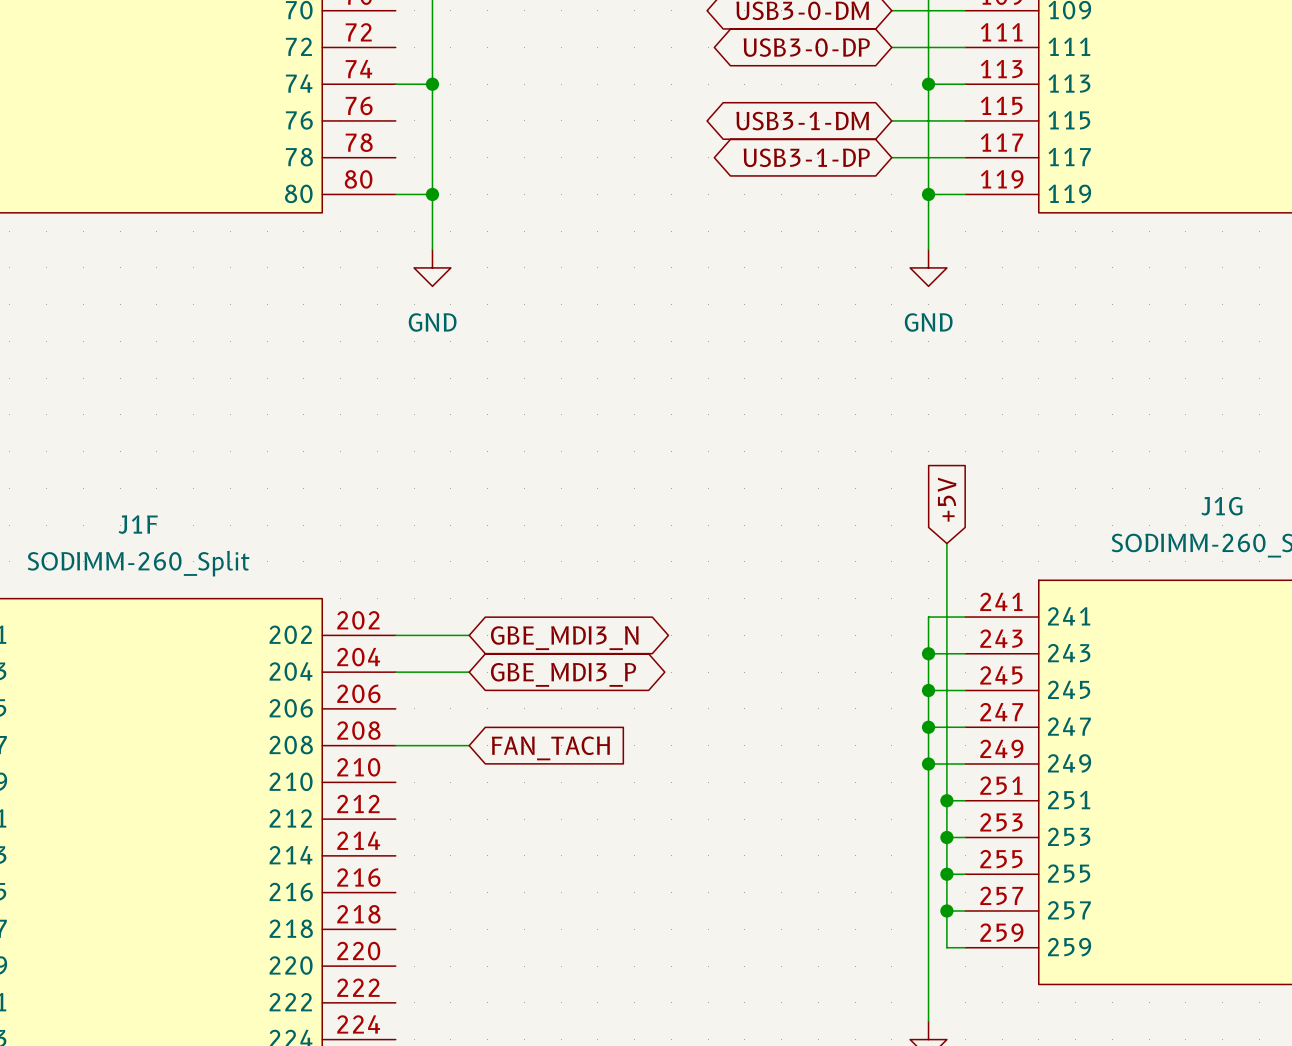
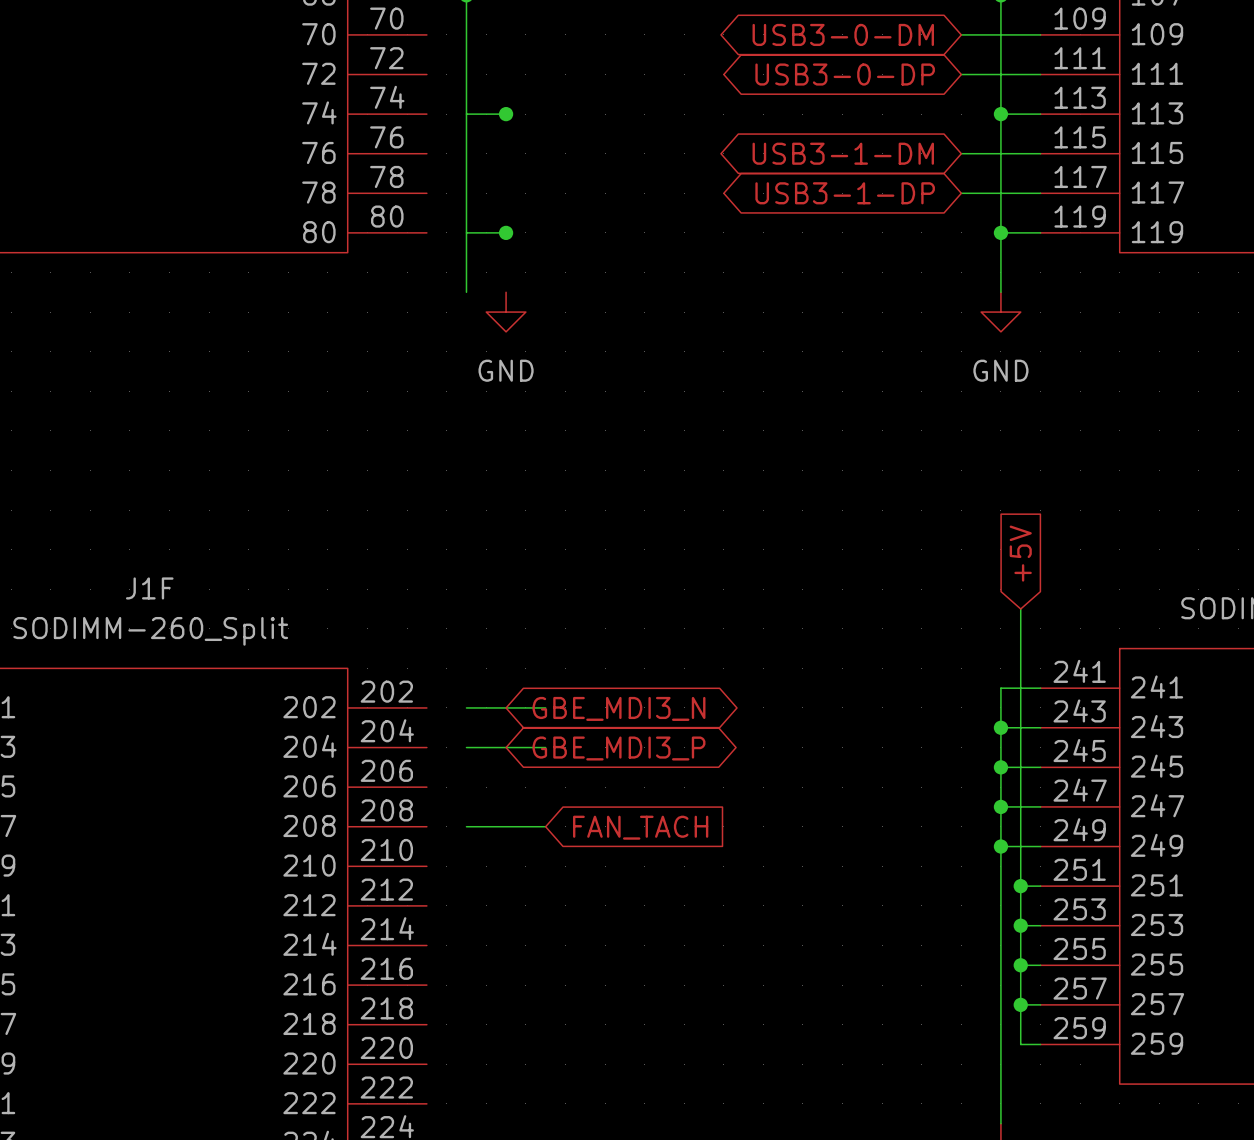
wire: (395, 84) (432, 84) -> (506, 114) (466, 114)
junction position: (432, 84) -> (506, 114)
wire: (395, 194) (432, 194) -> (506, 232) (466, 232)
junction position: (432, 194) -> (506, 232)
power symbol position: GND (432, 267) -> GND (506, 312)
wire: (395, 635) (432, 635) -> (506, 707) (545, 707)
wire: (395, 672) (432, 672) -> (506, 747) (545, 747)
wire: (395, 745) (432, 745) -> (506, 826) (545, 826)
global label position: FAN_TACH (550, 748) -> FAN_TACH (640, 827)

